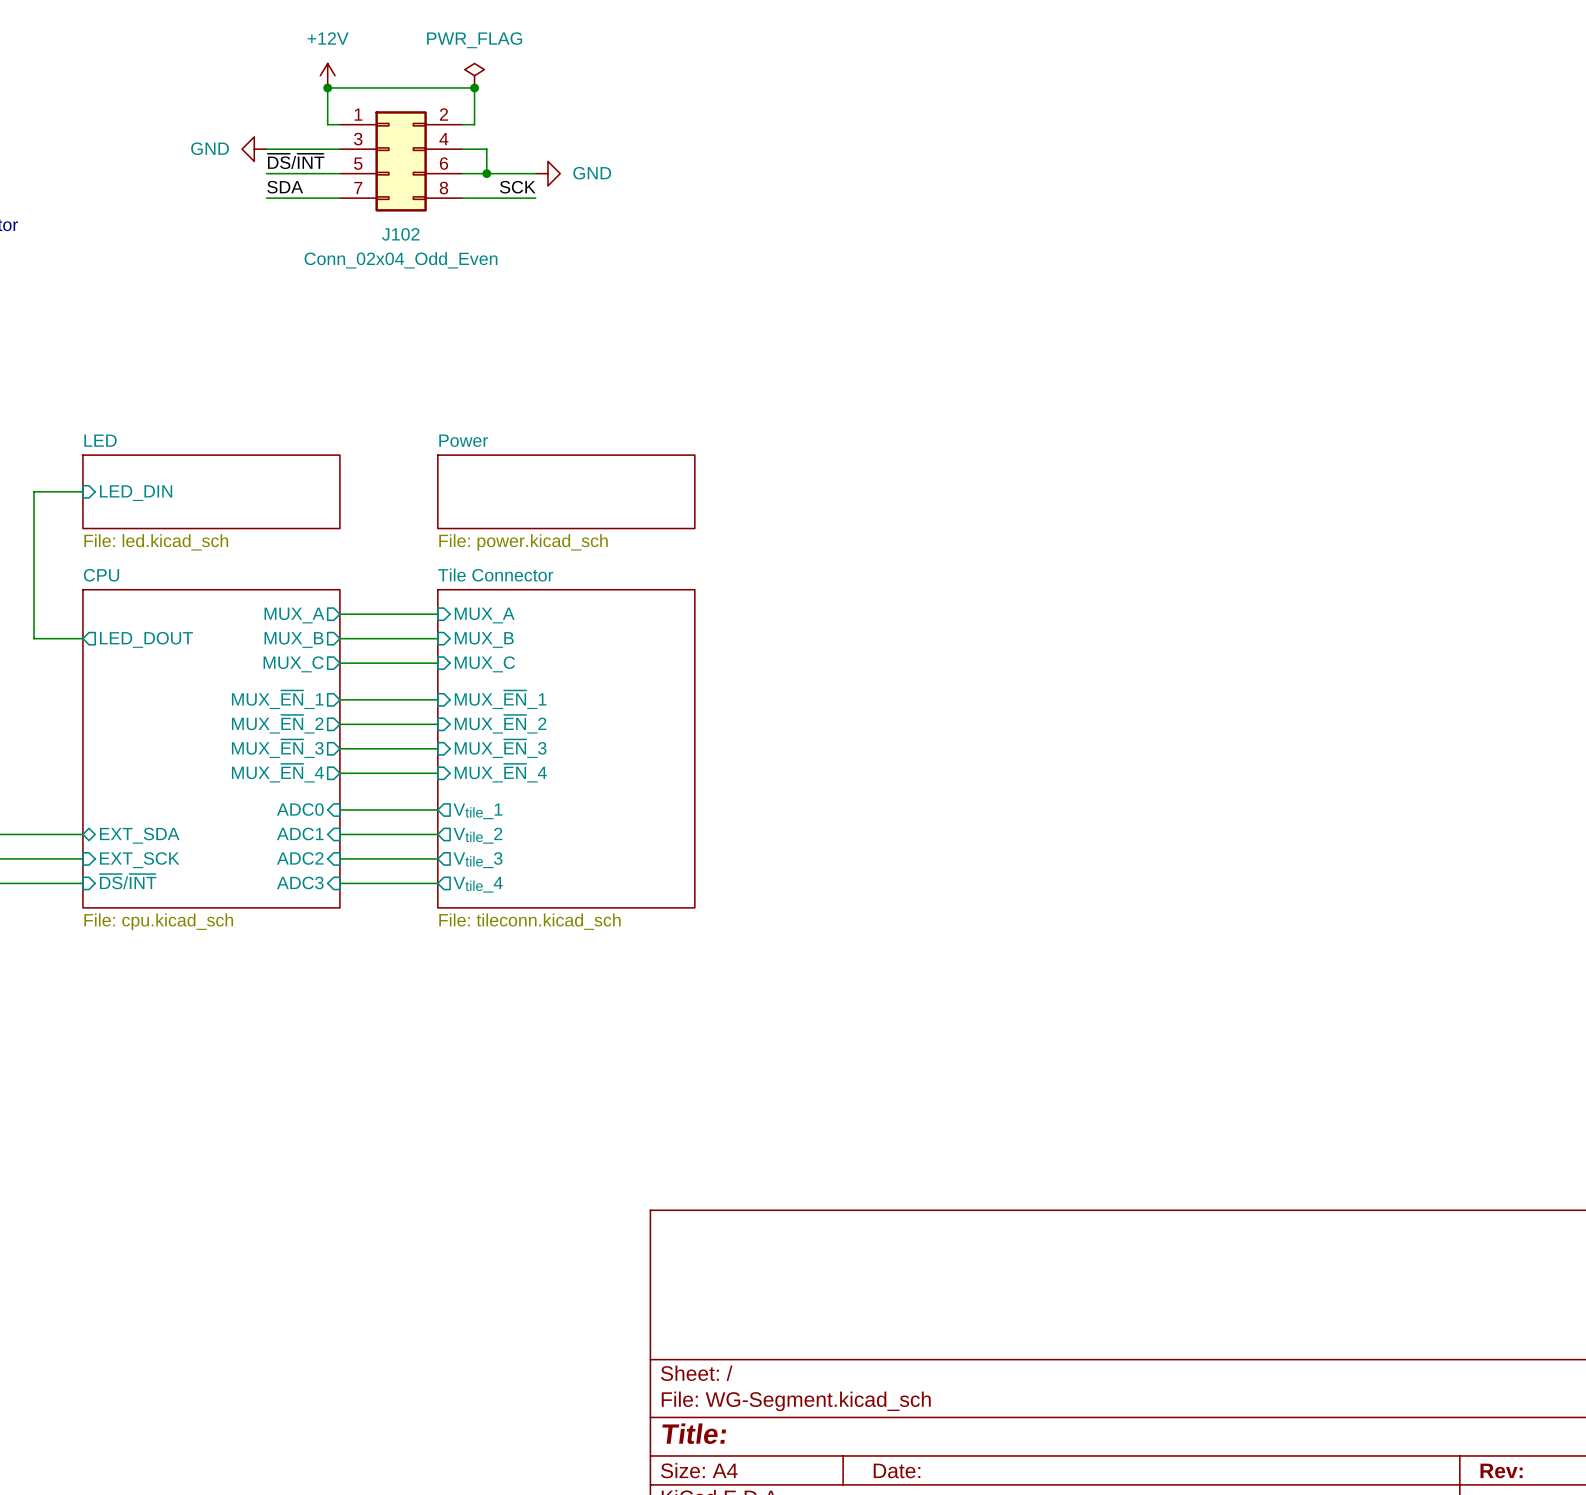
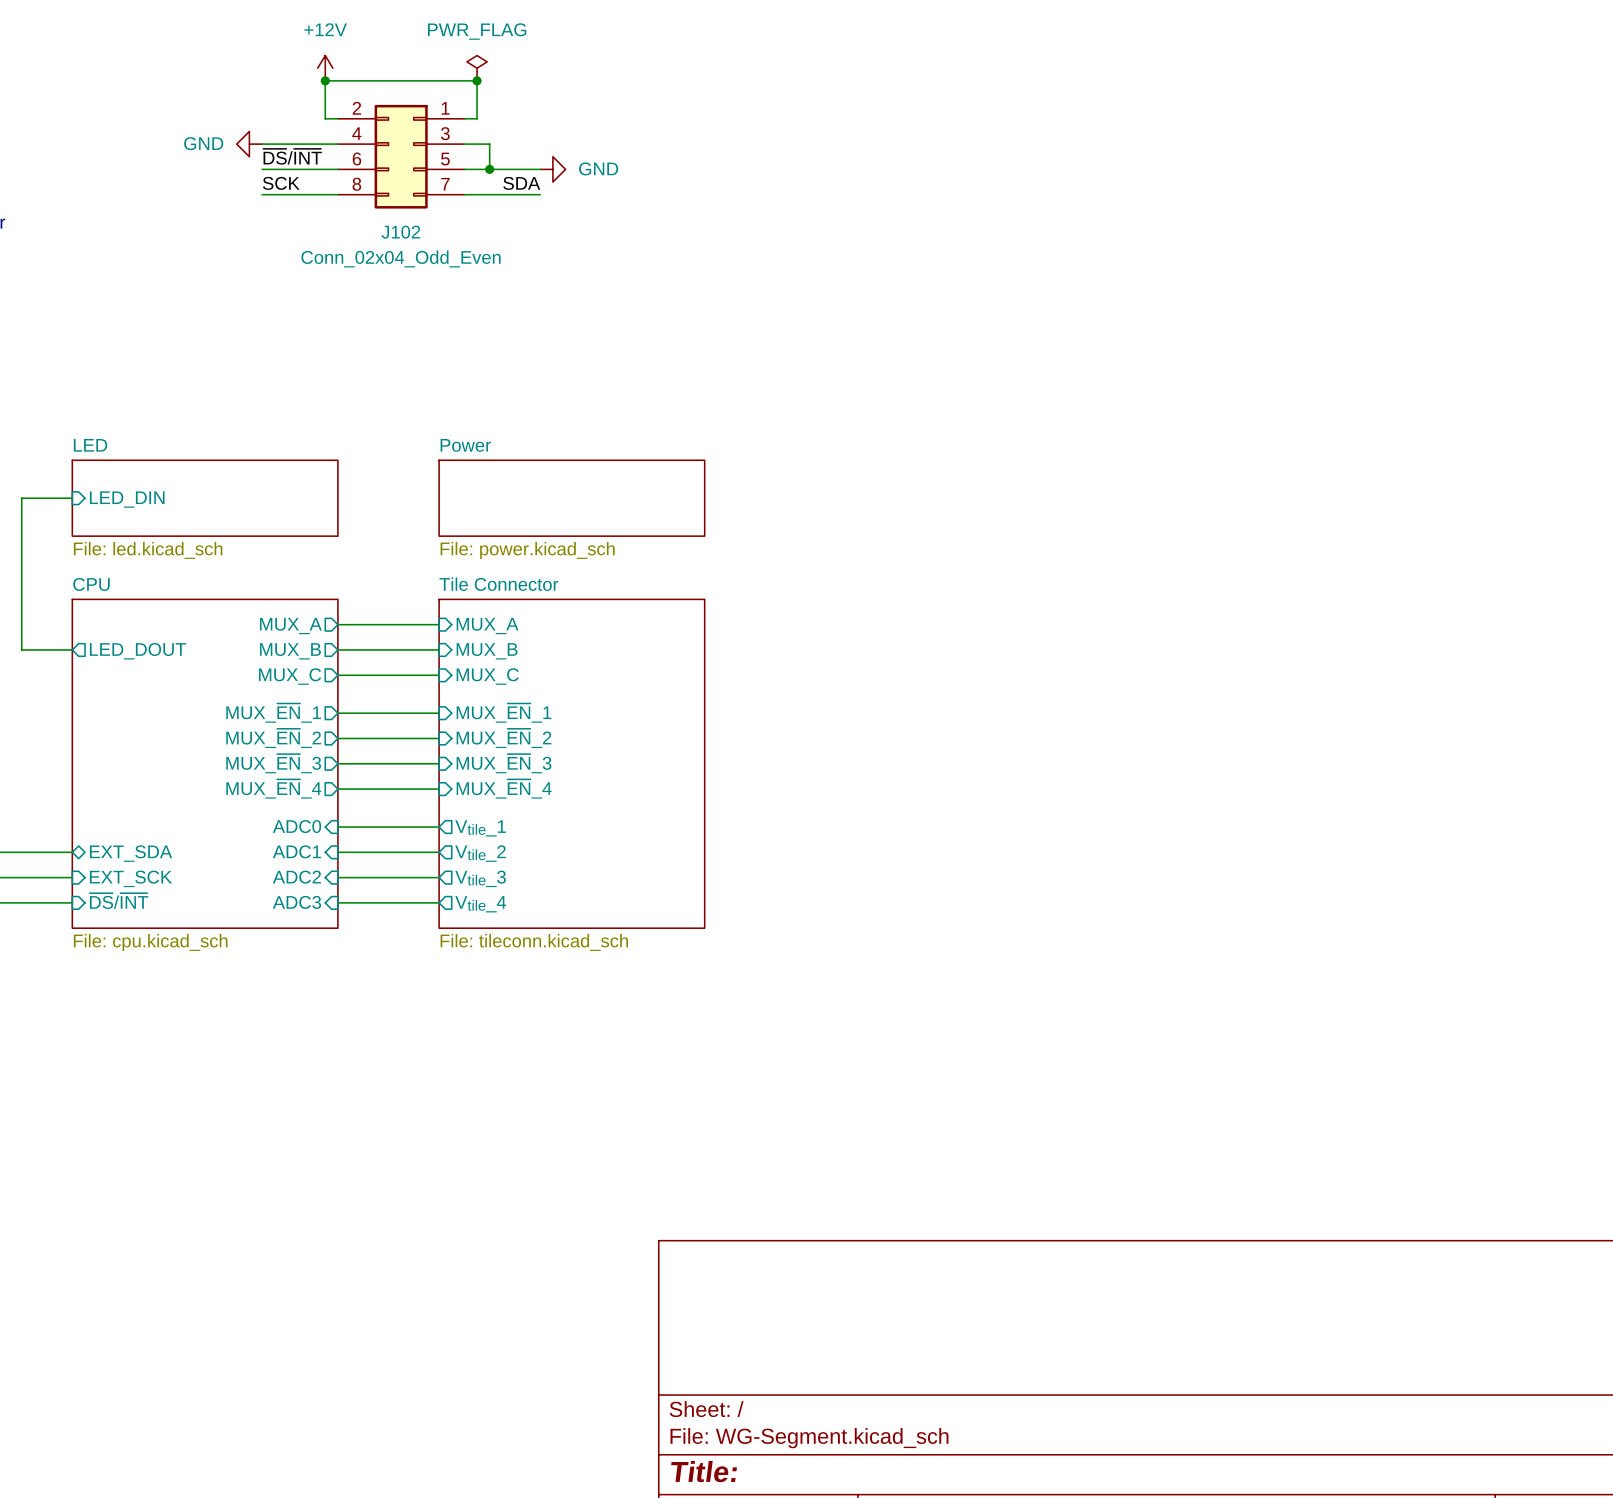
J102 flip: as is (401, 161) -> left-right (401, 156)
label: SDA (285, 187) -> SCK (281, 183)
label: SCK (517, 187) -> SDA (521, 183)

